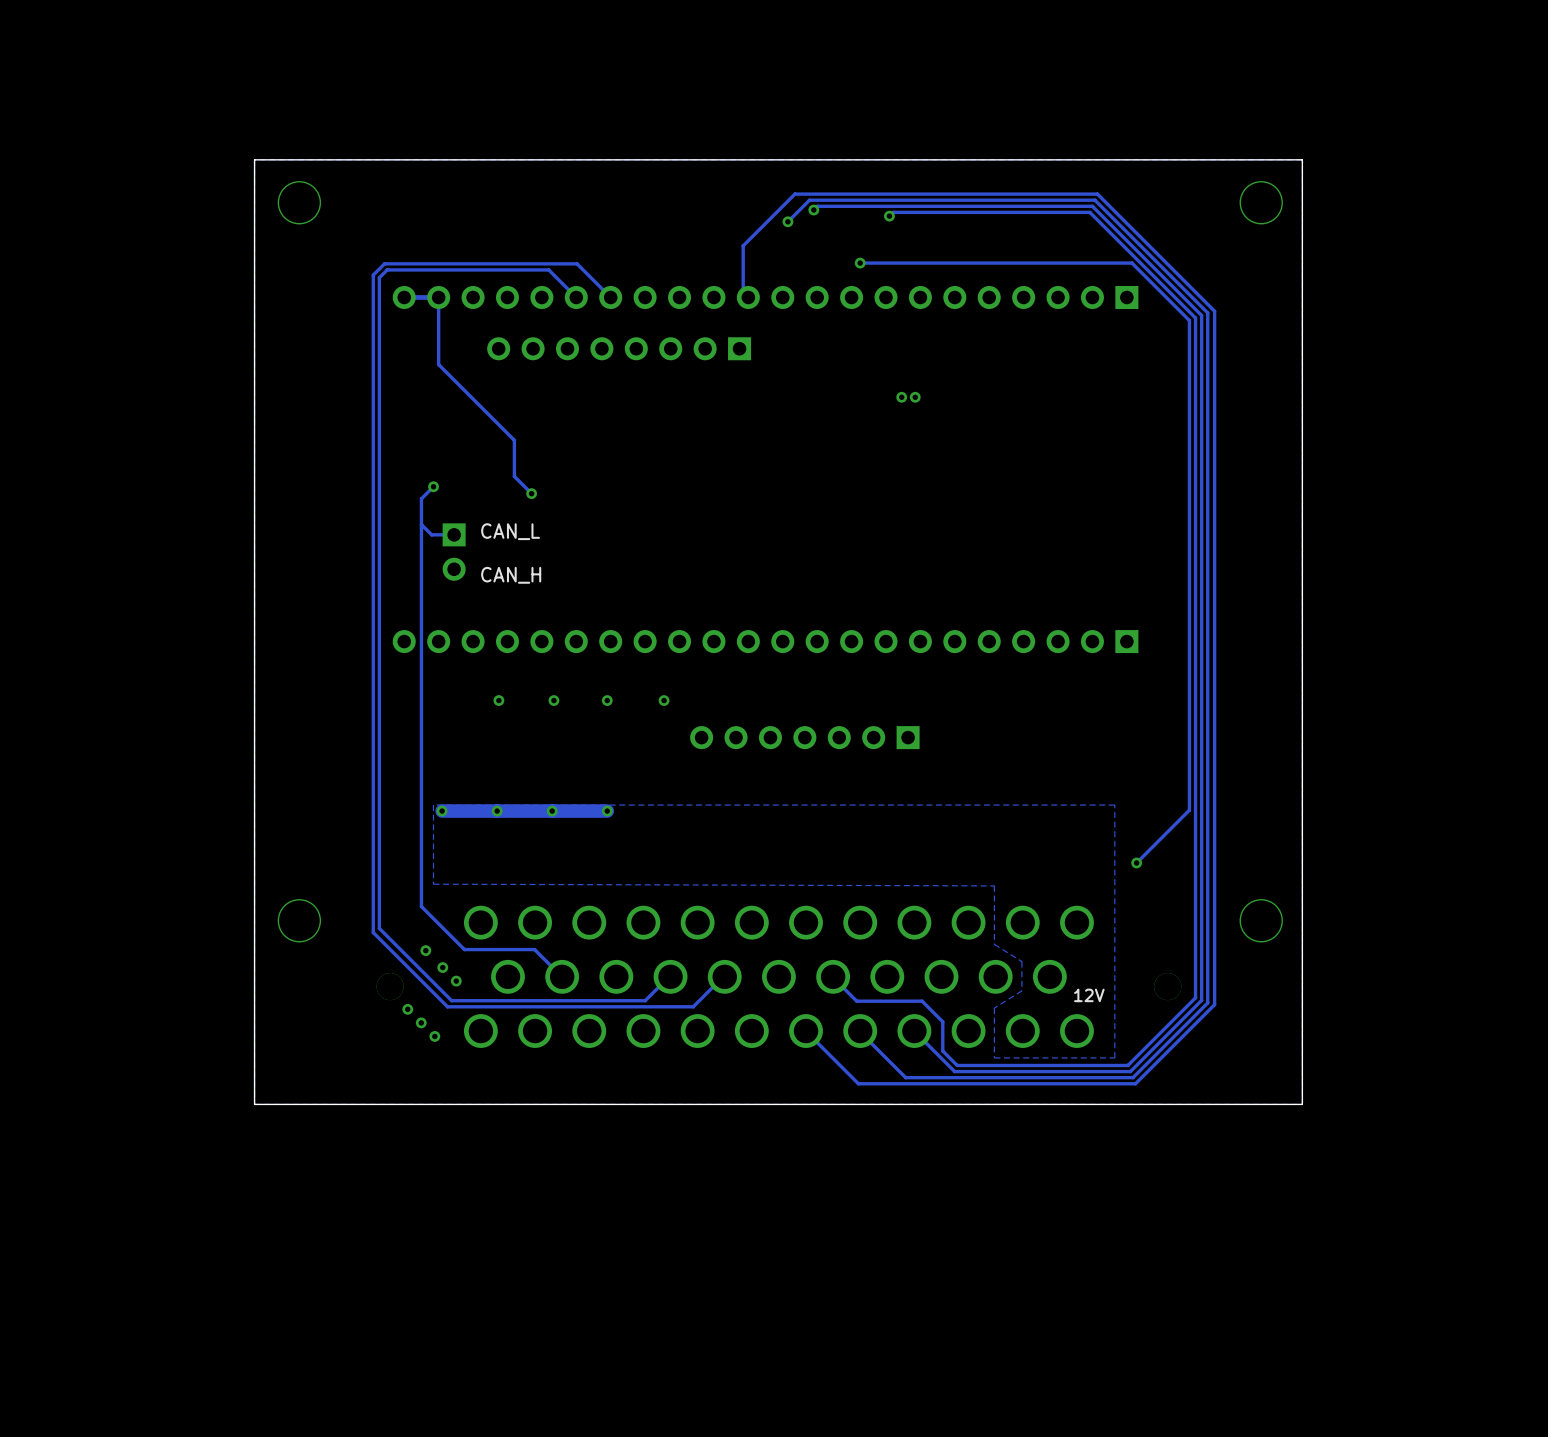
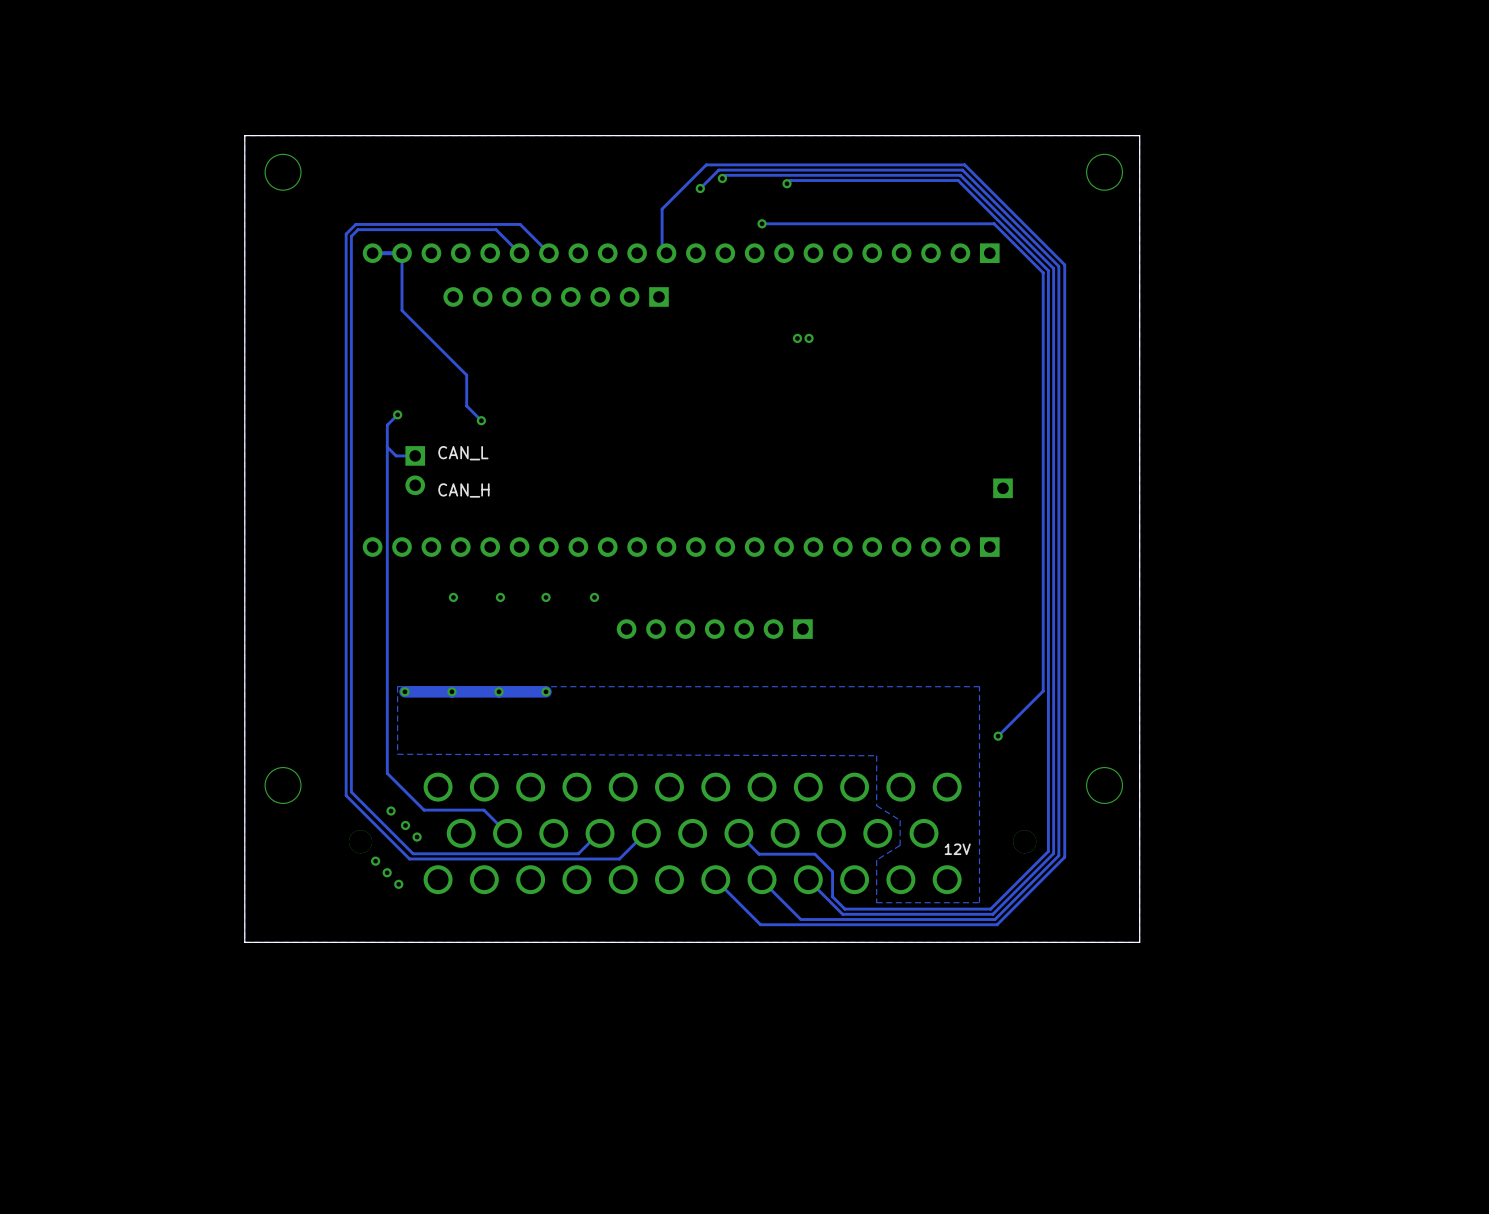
part: none -> (1003, 488)

